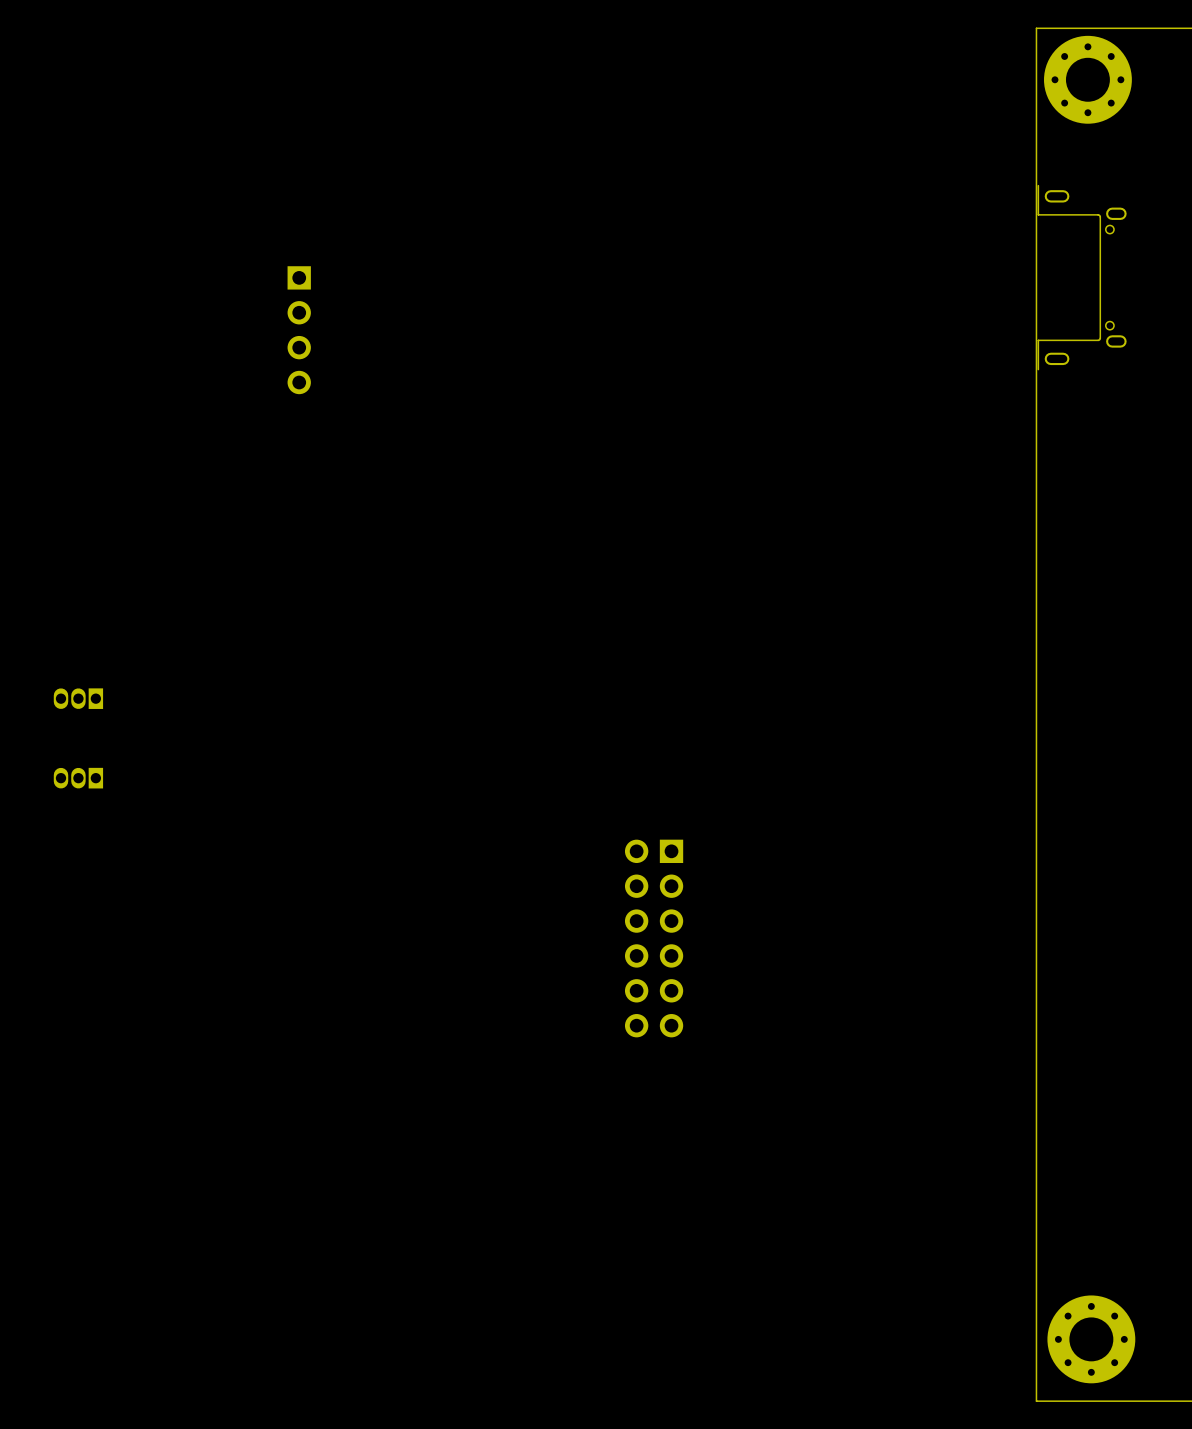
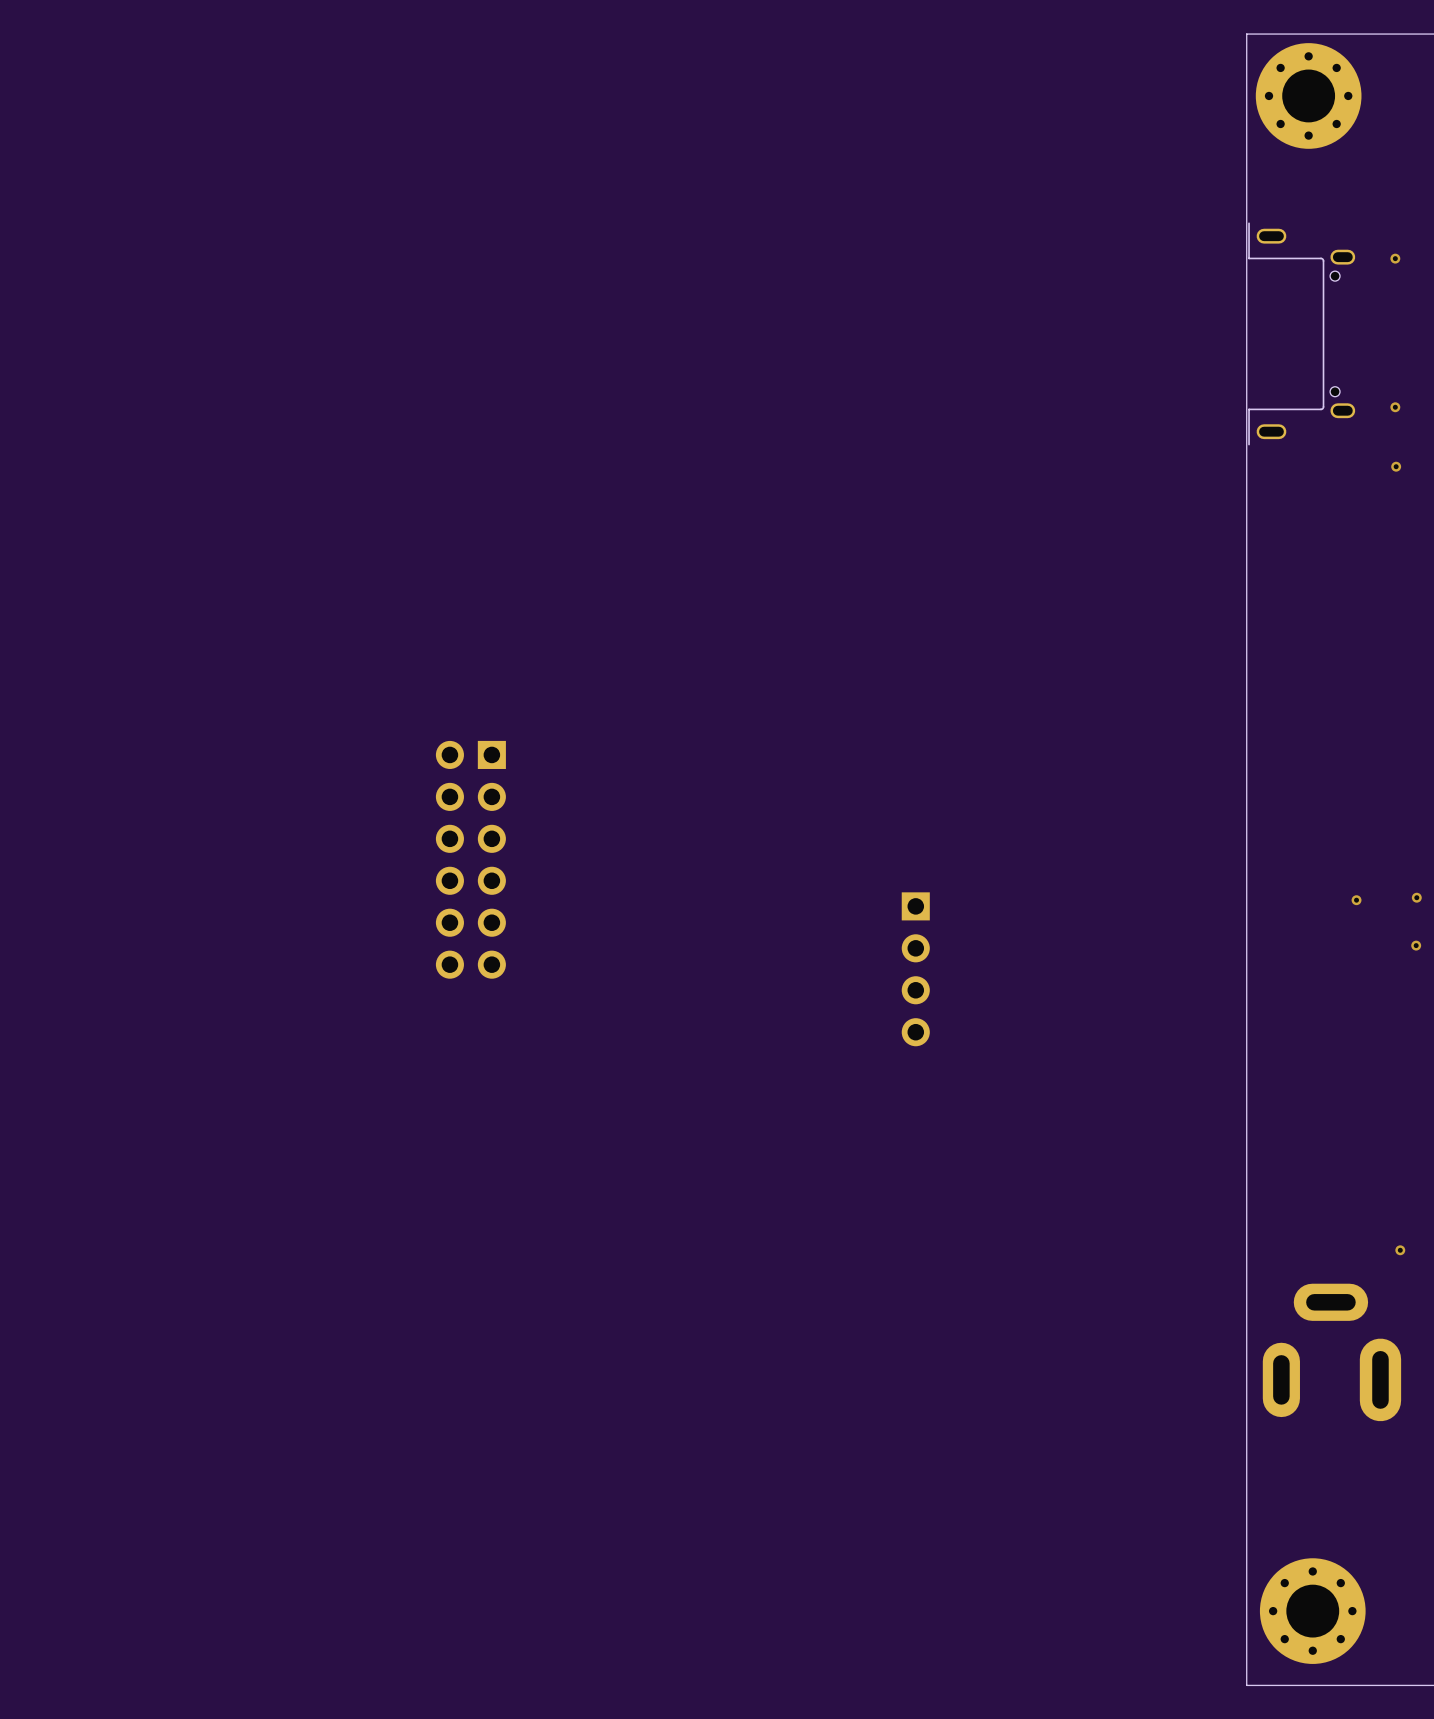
via: none -> (1395, 258)
part: (299, 330) -> none
via: none -> (1395, 407)
via: none -> (1396, 466)
part: (78, 698) -> none
part: none -> (470, 859)
via: none -> (1416, 897)
via: none -> (1356, 900)
part: (78, 778) -> none
via: none -> (1416, 945)
part: none -> (915, 969)
part: (654, 938) -> none
via: none -> (1400, 1250)
part: none -> (1331, 1352)

